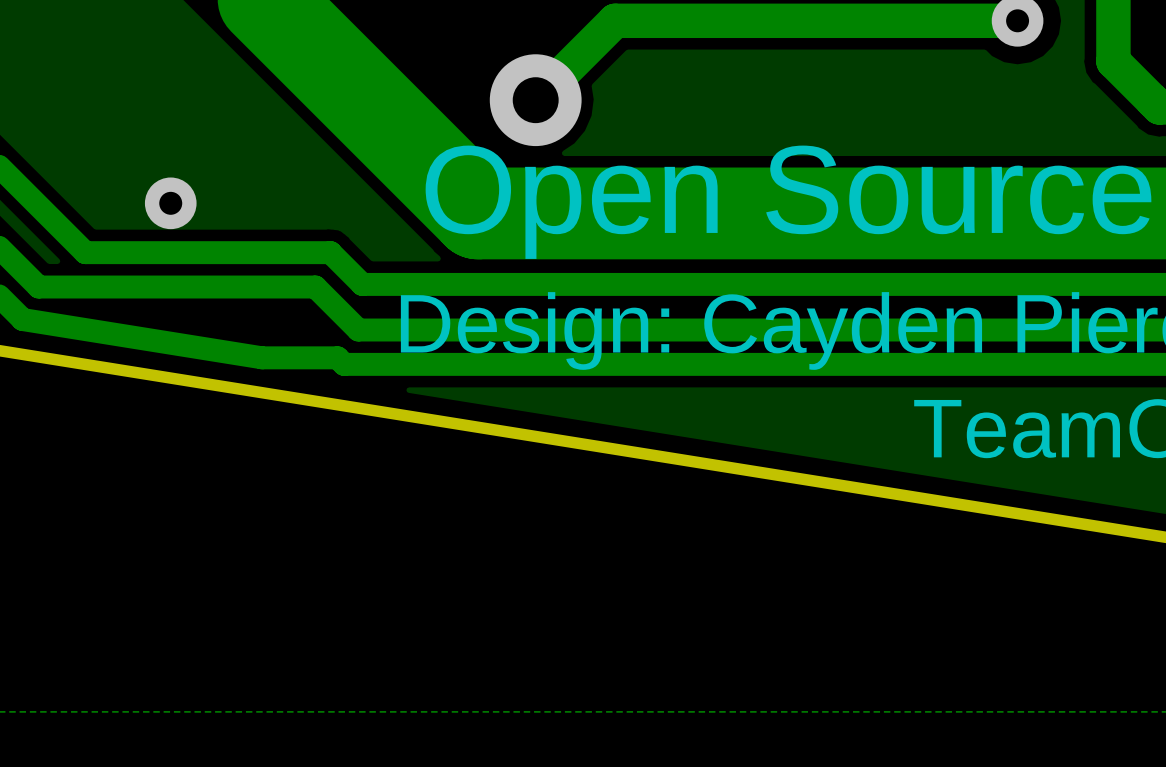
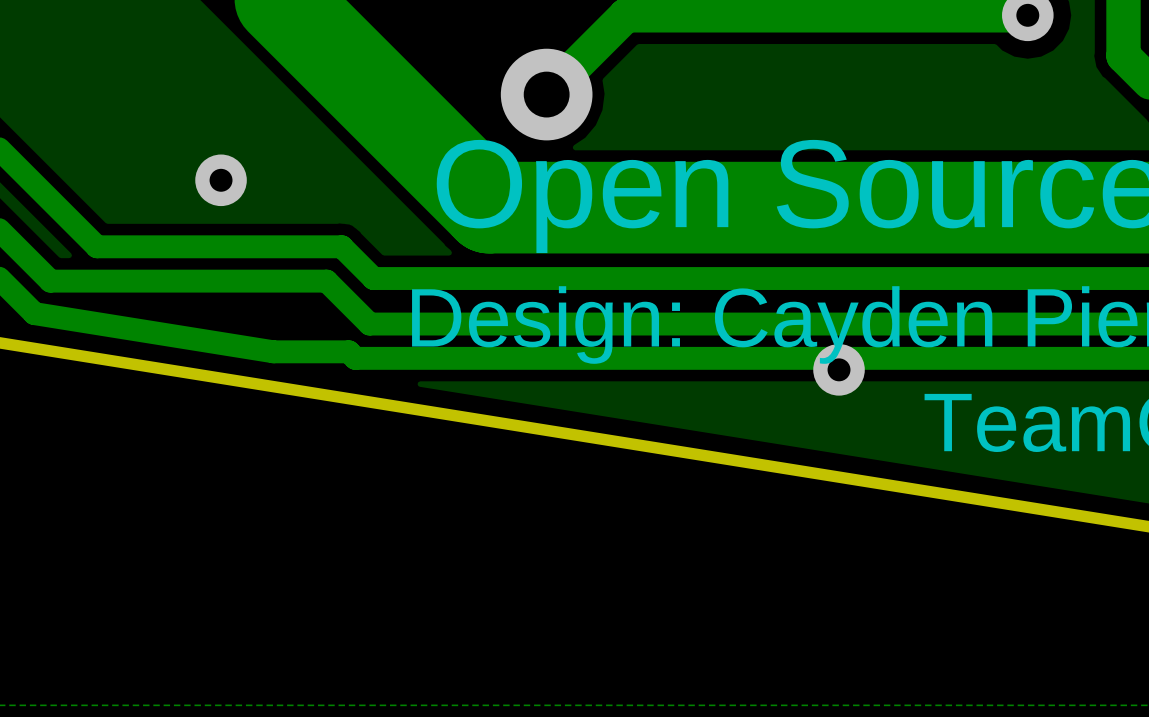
via position: (170, 203) -> (221, 180)
via: none -> (839, 369)

